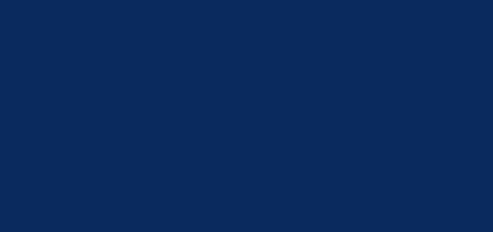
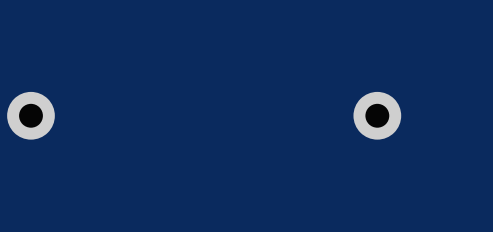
part: none -> (30, 115)
part: none -> (377, 115)

